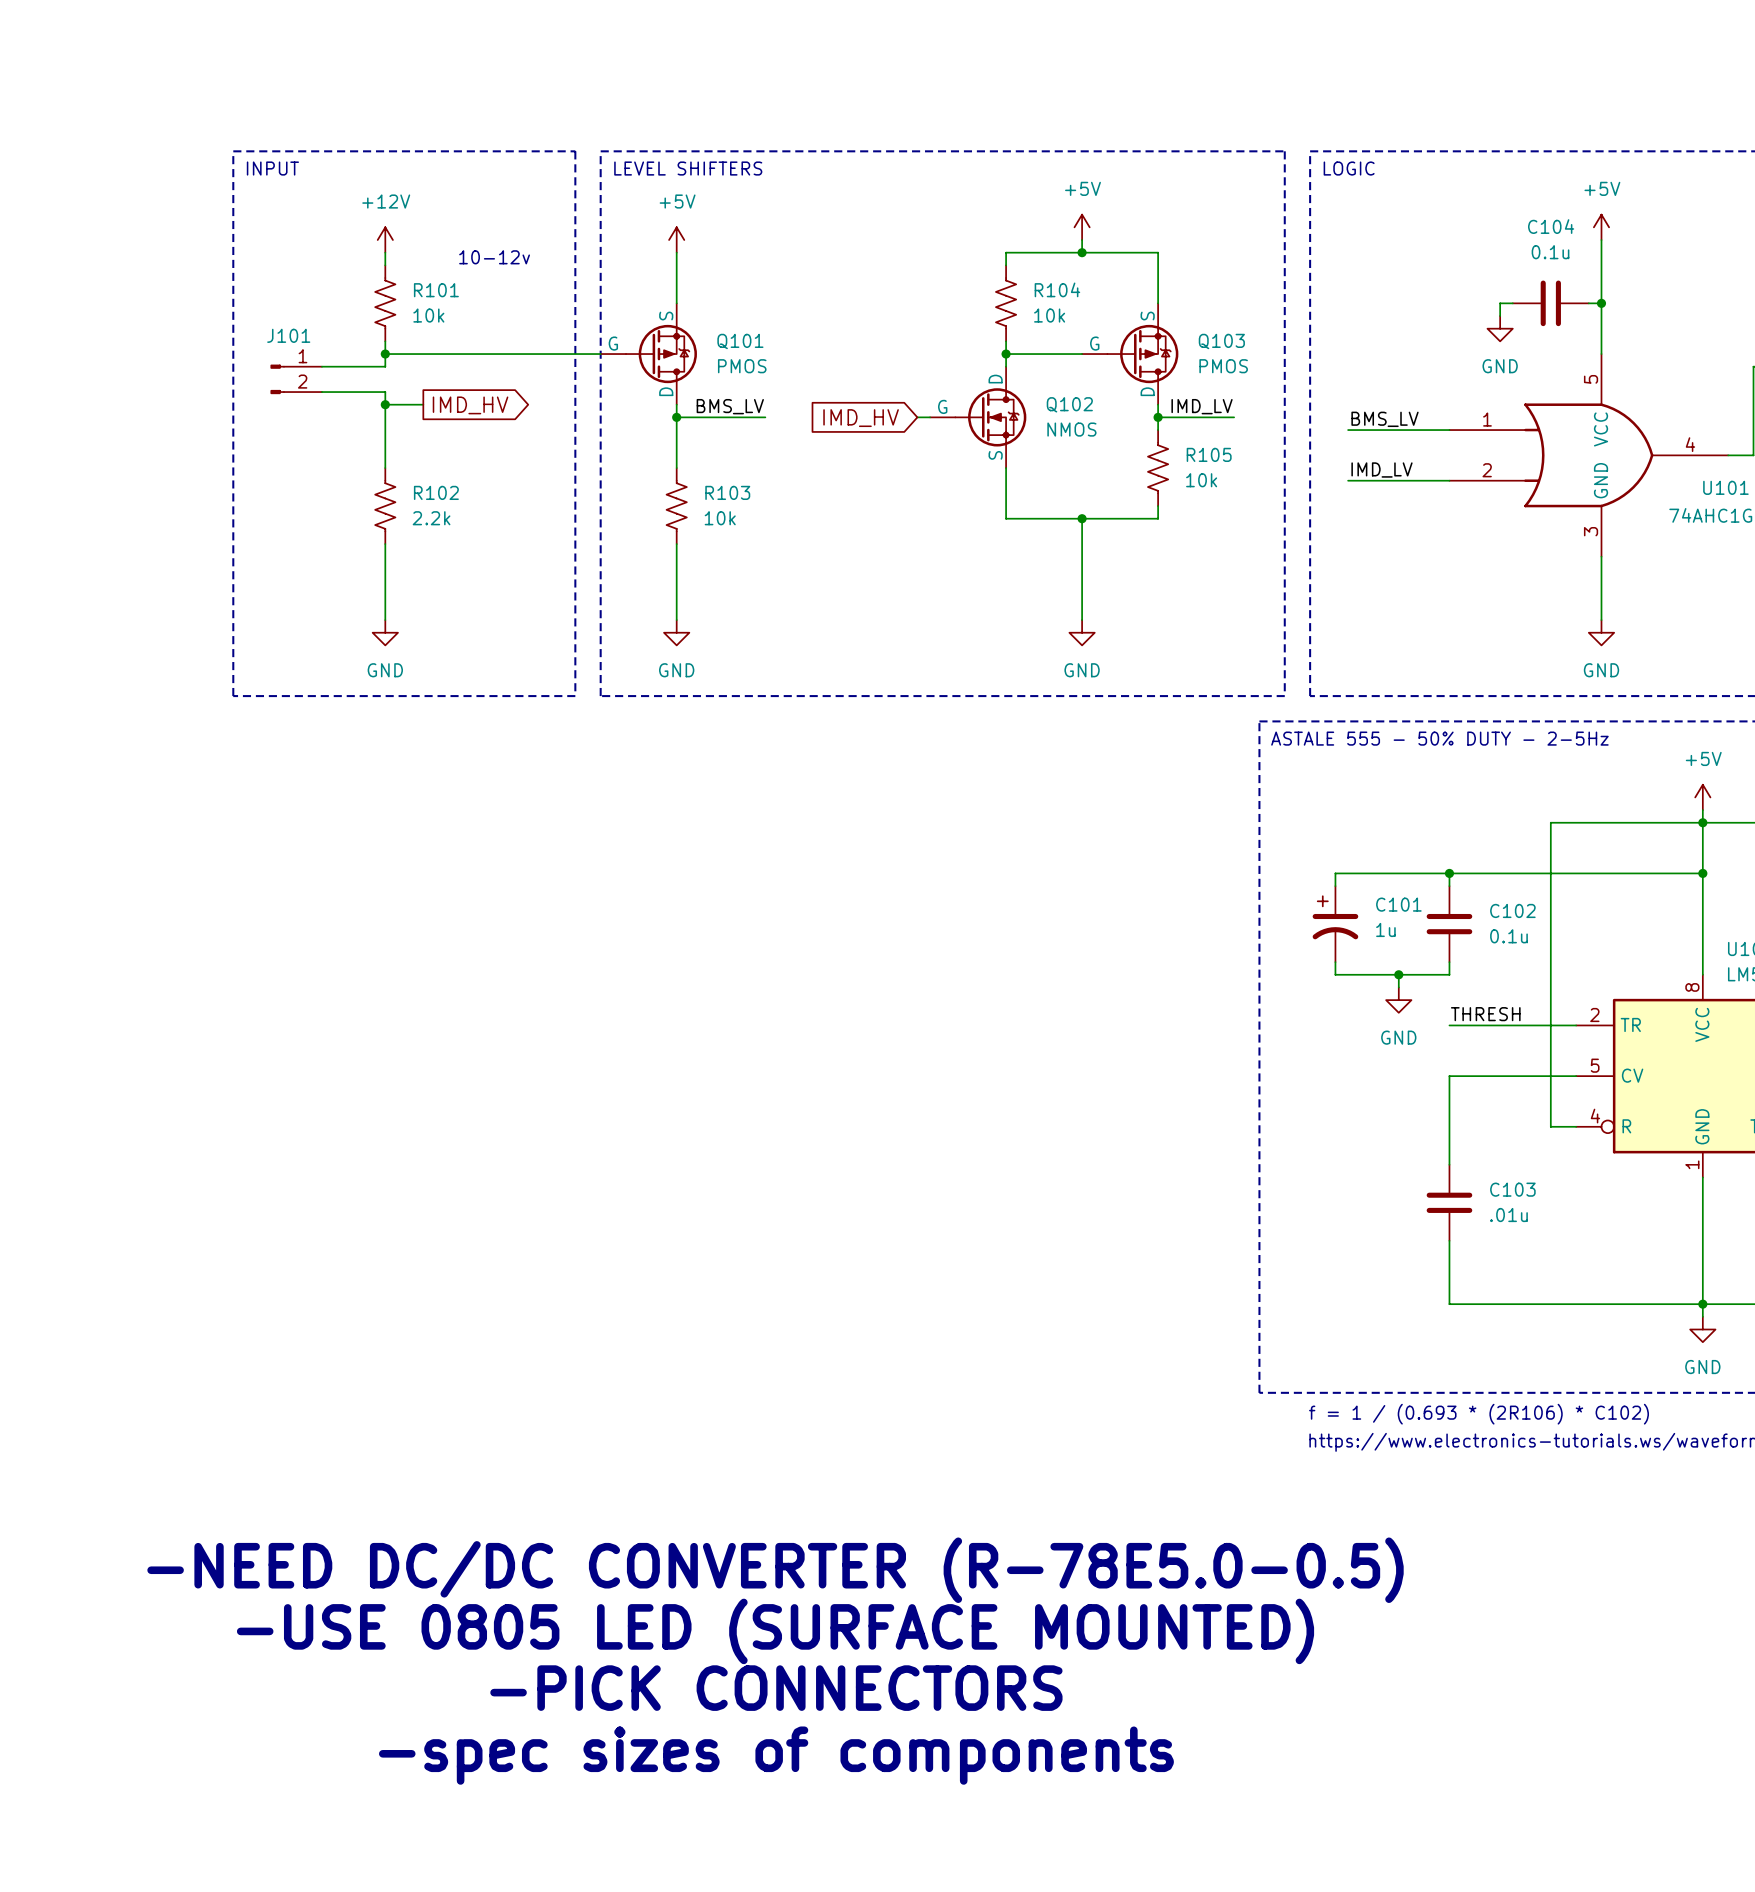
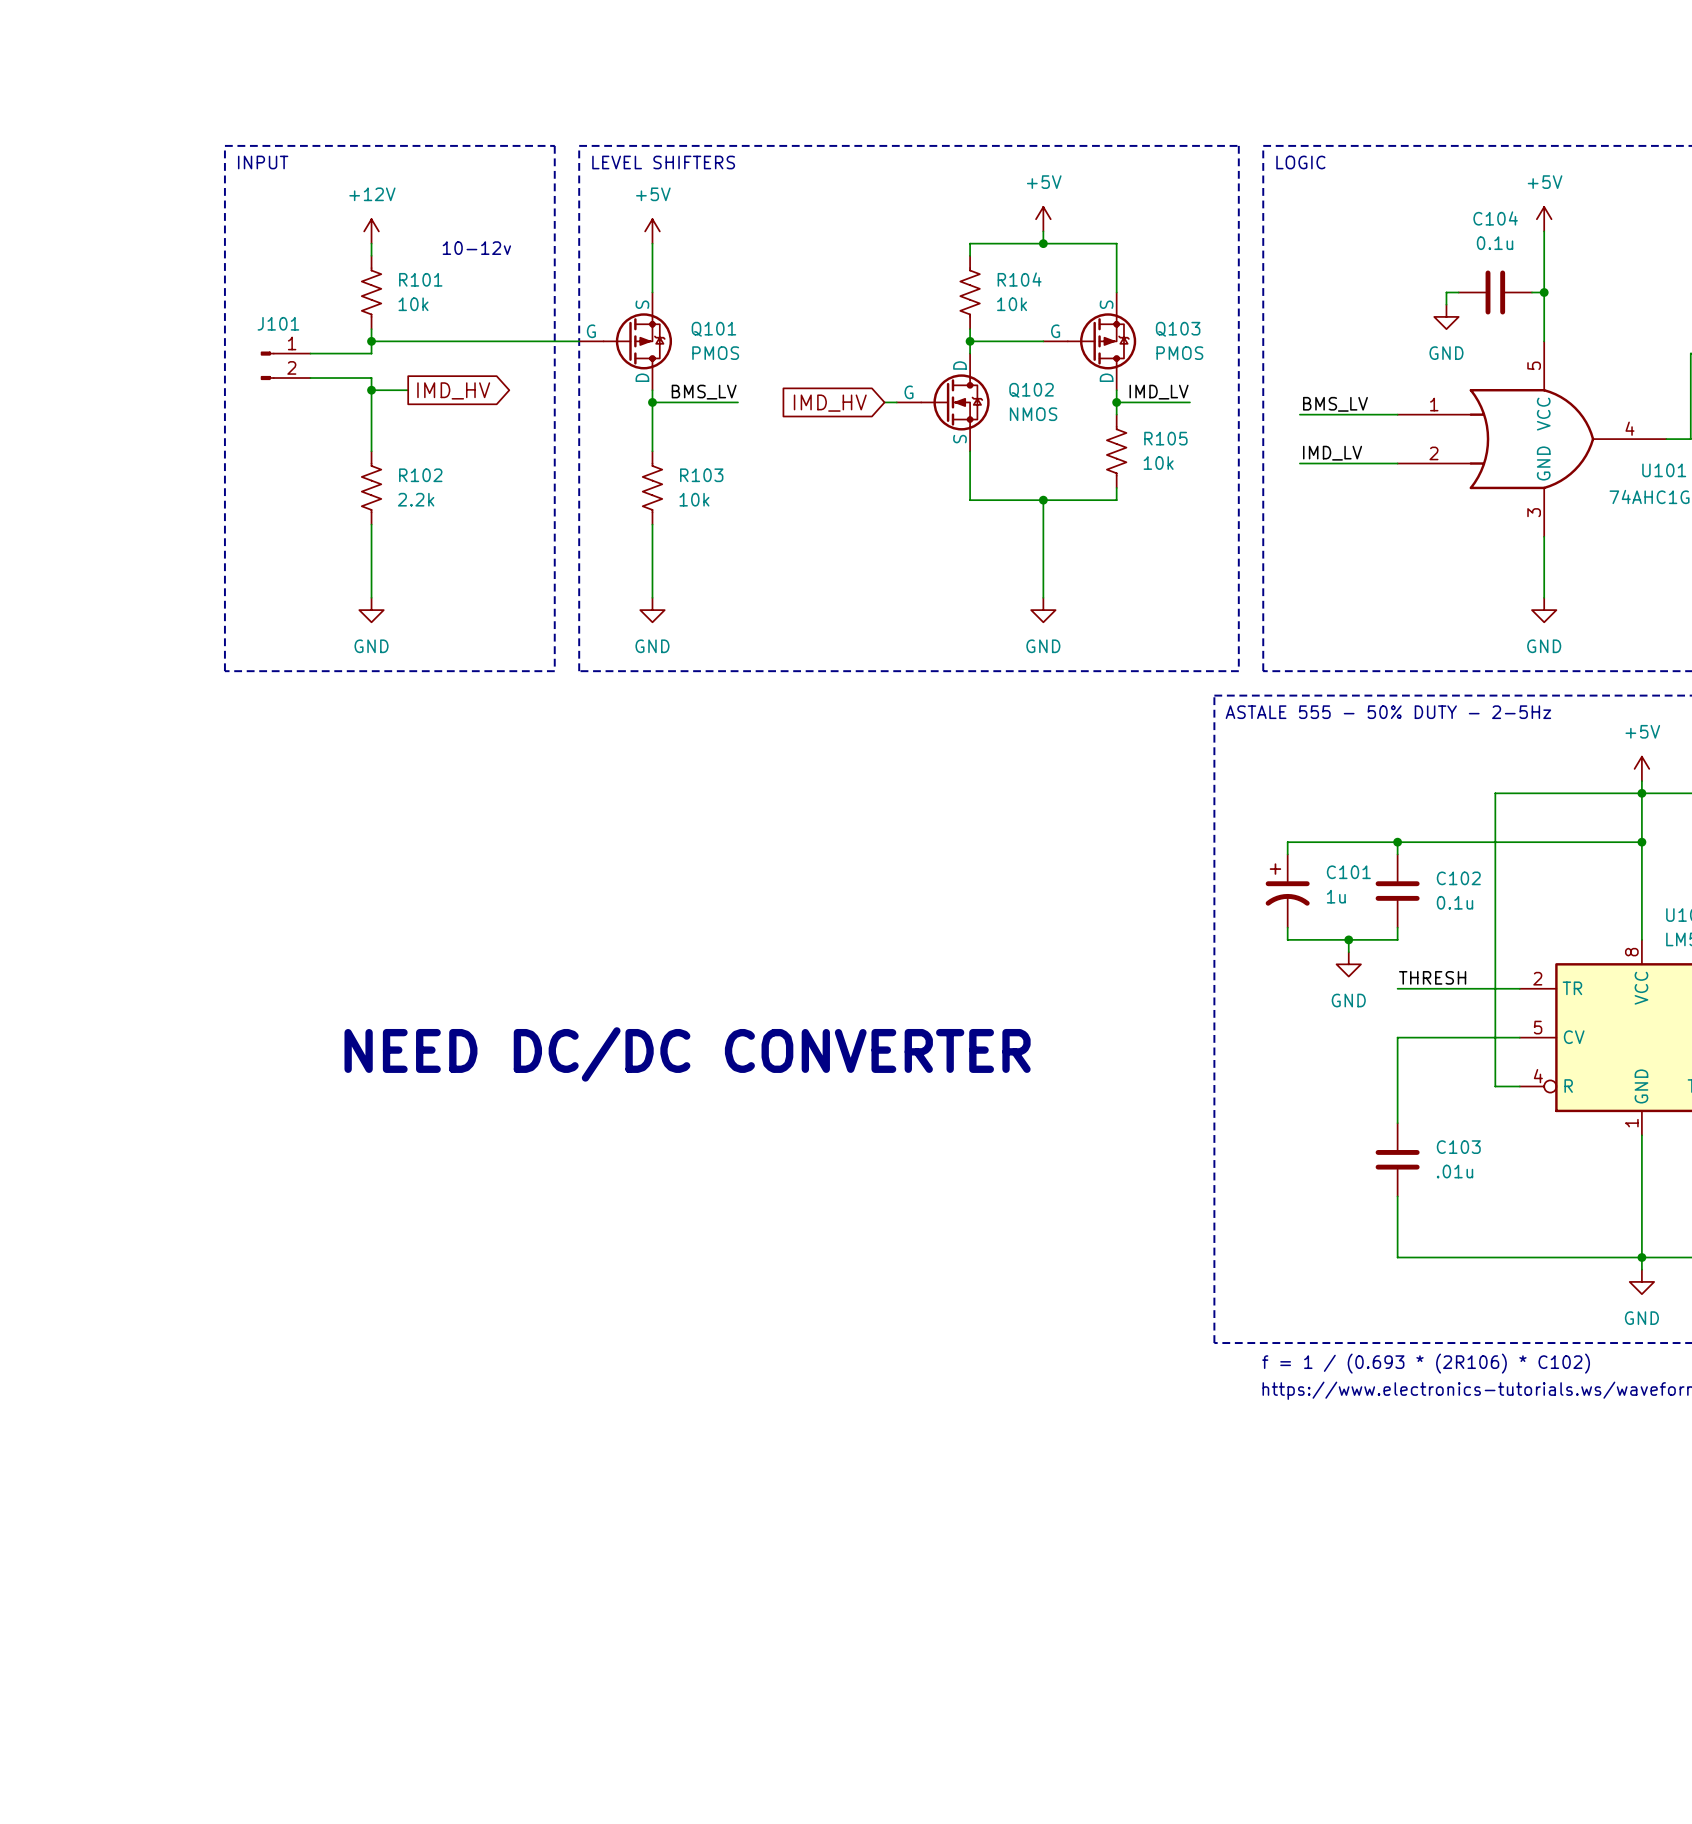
text: none -> NEED DC/DC CONVERTER (687, 1054)
text: -NEED DC/DC CONVERTER (R-78E5.0-0.5) (775, 1570) -> none
text: -USE 0805 LED (SURFACE MOUNTED) (775, 1631) -> none
text: -PICK CONNECTORS (776, 1688) -> none
text: -spec sizes of components (776, 1755) -> none

